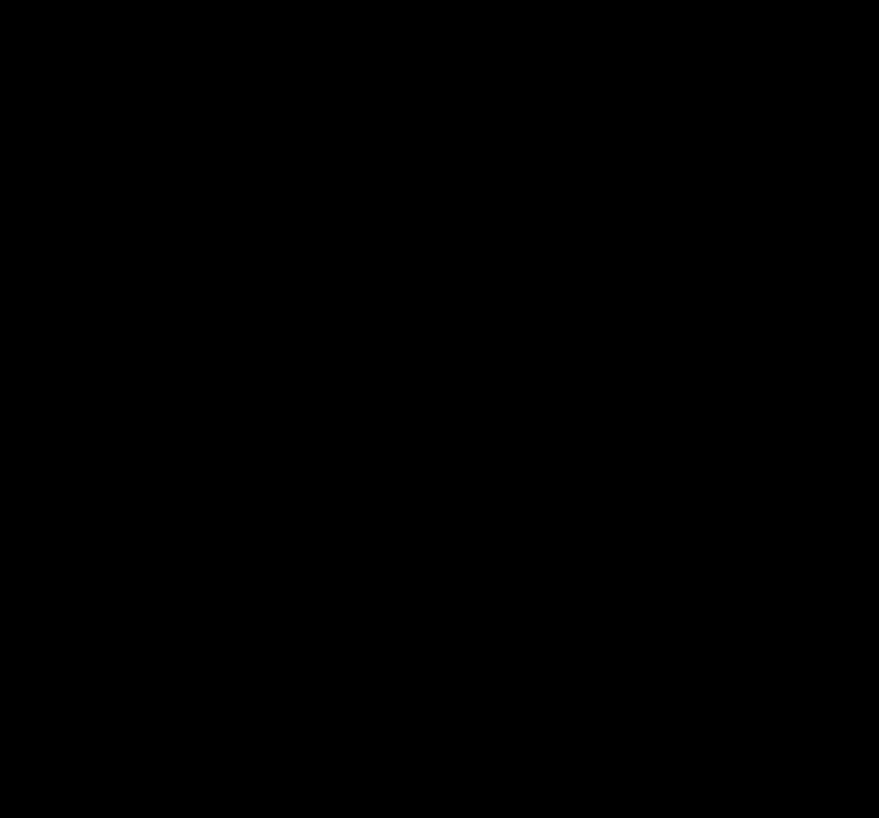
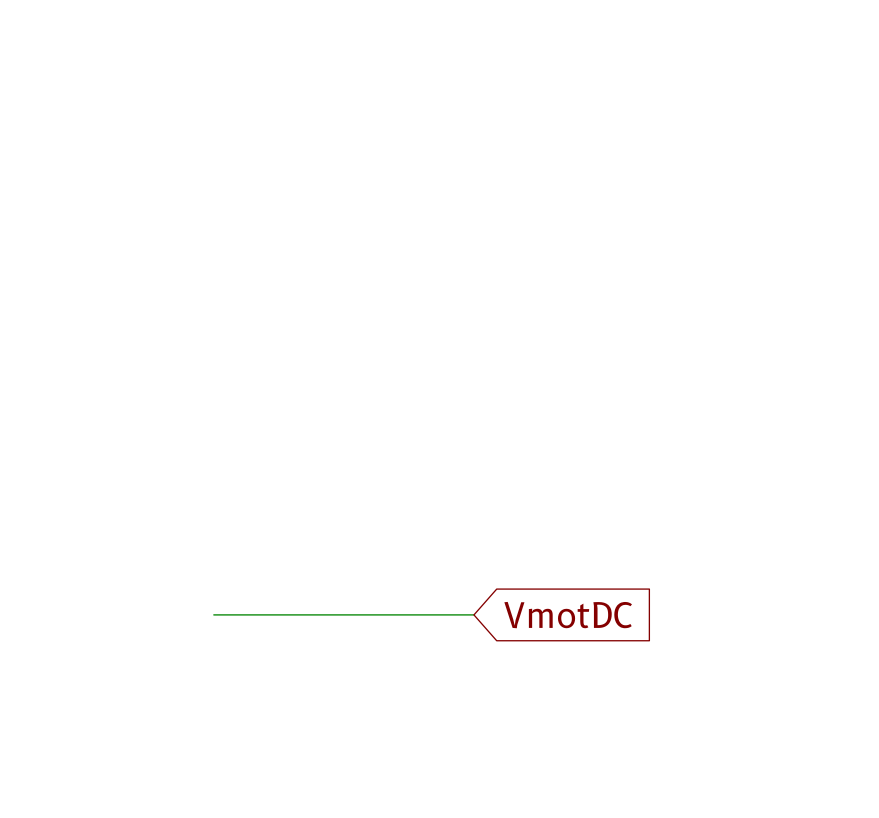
wire: none -> (213, 614) (473, 614)
global label: none -> VmotDC (568, 615)

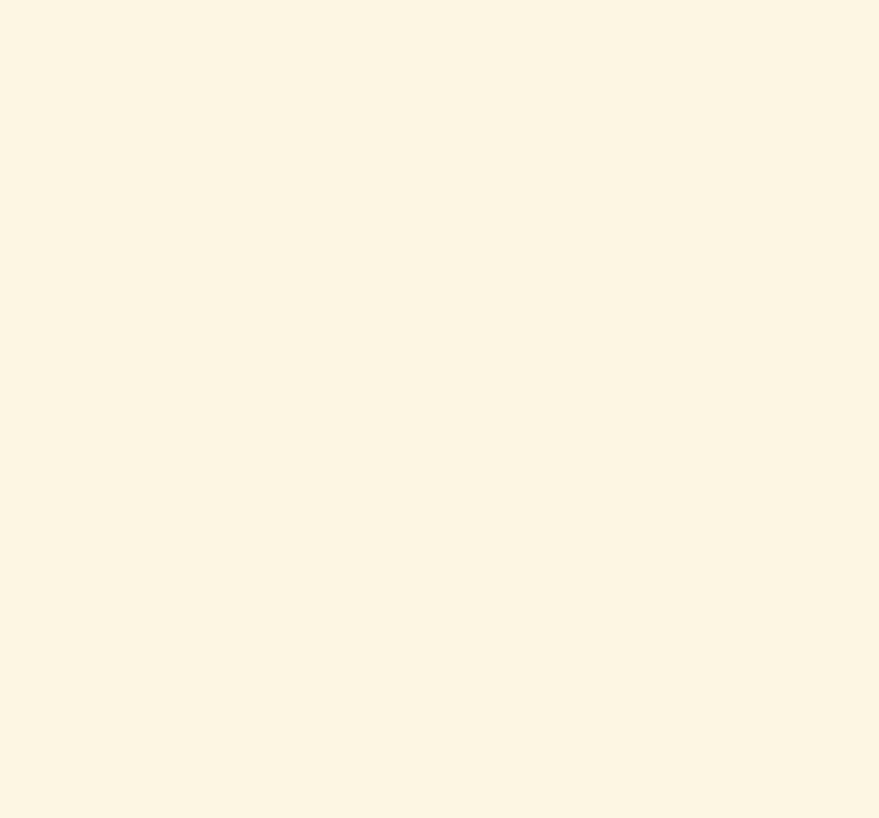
wire: (213, 614) (473, 614) -> none
global label: VmotDC (568, 615) -> none

